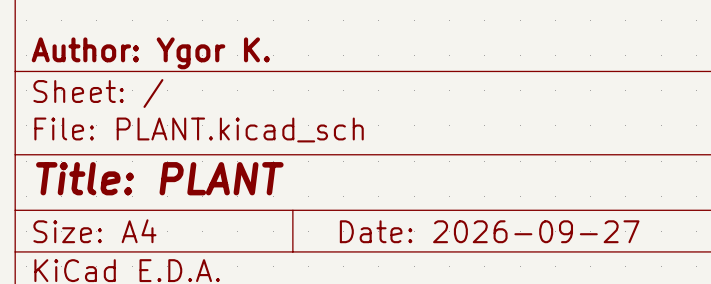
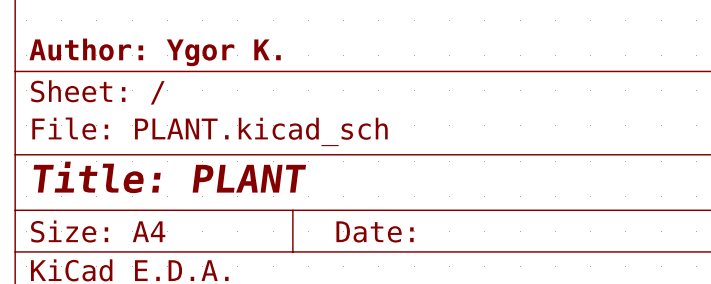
title block: Date: 2026-09-27 (489, 231) -> Date: (375, 231)

